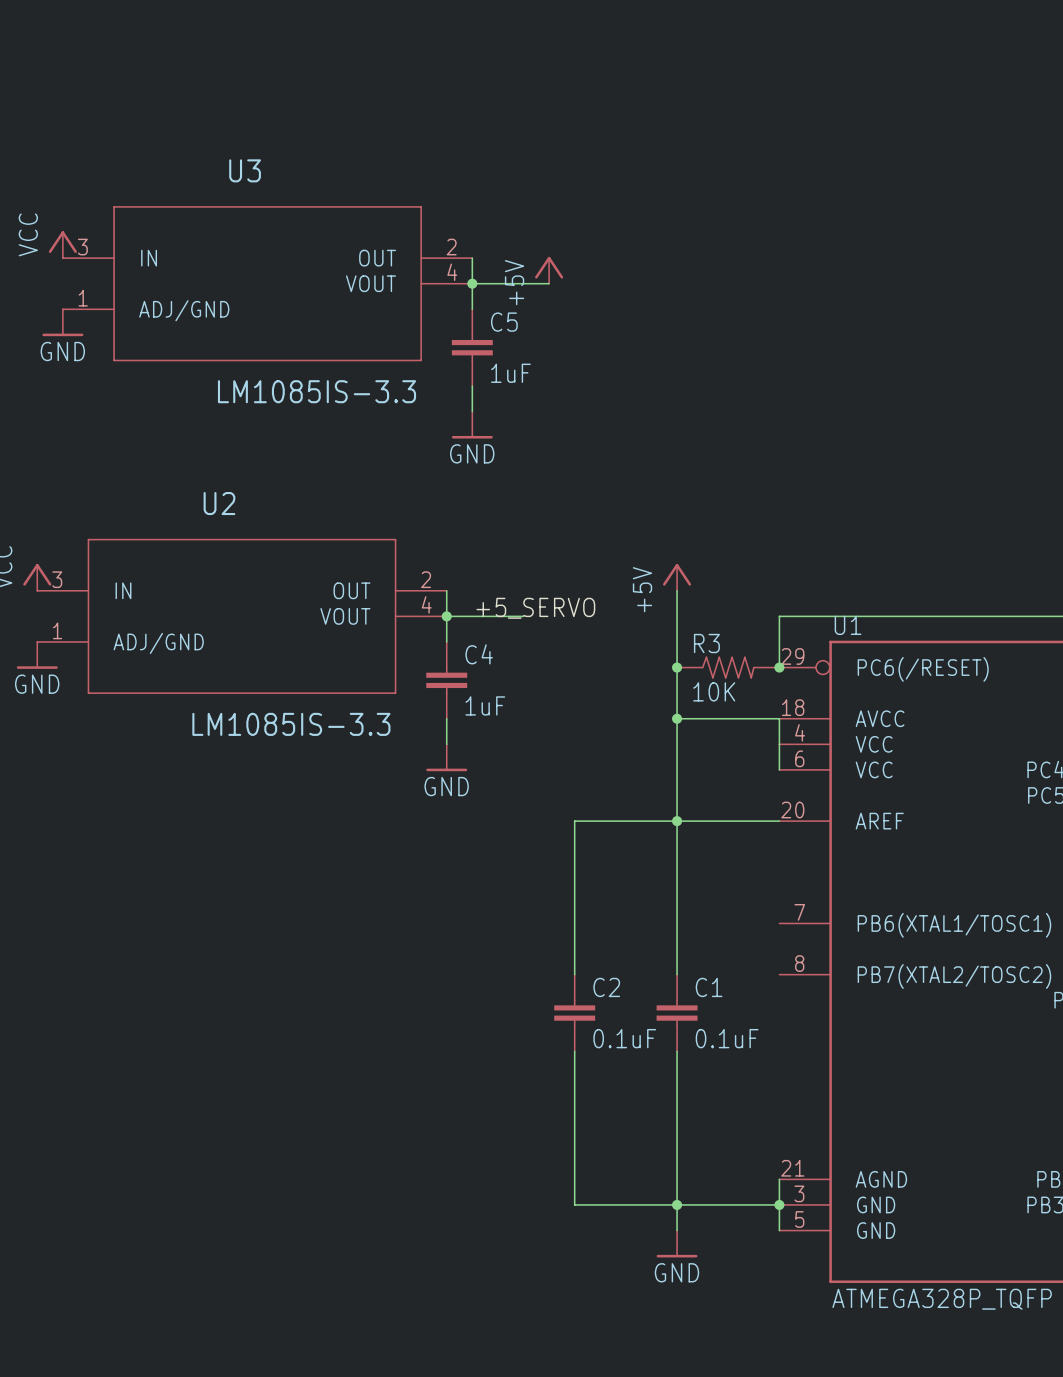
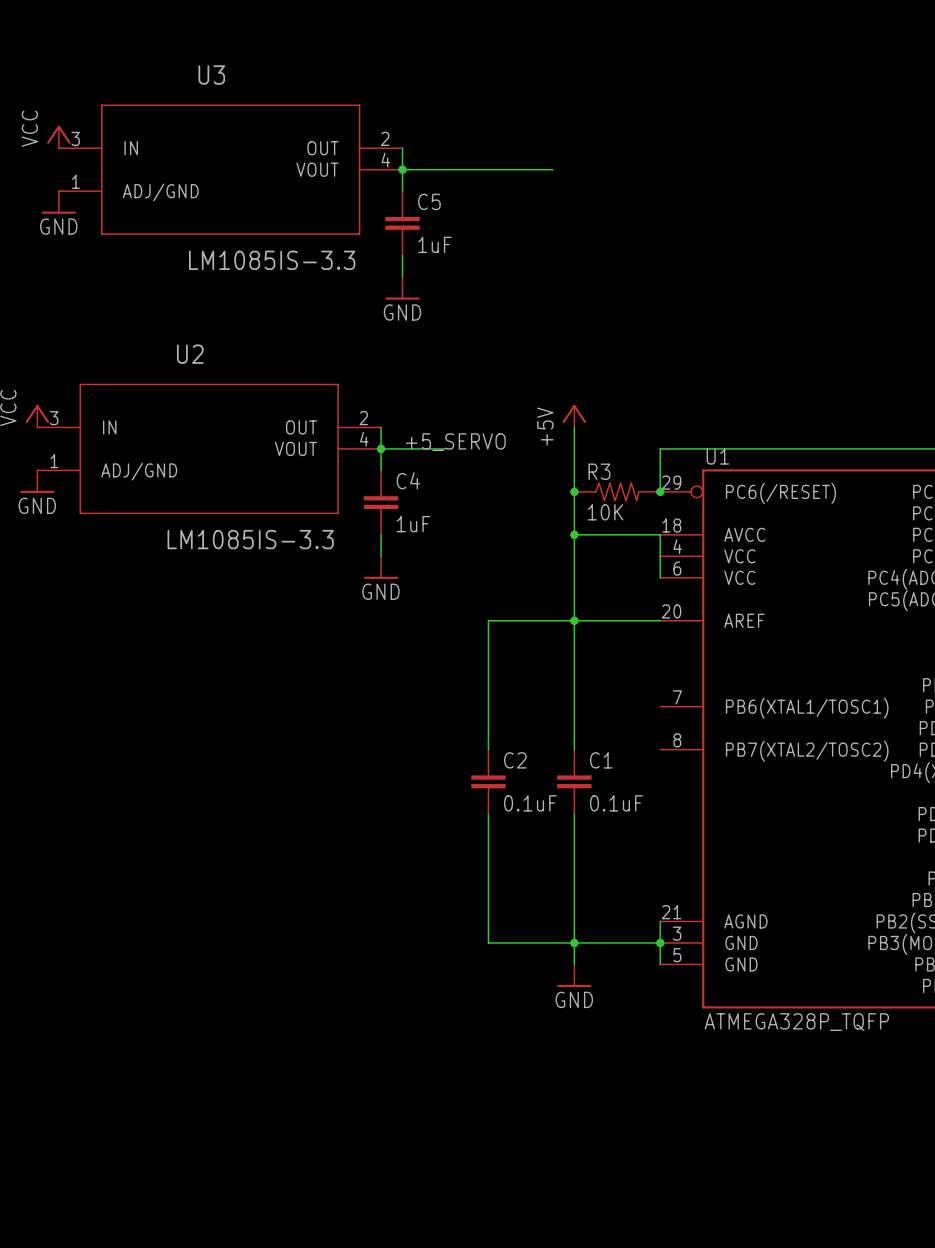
power symbol: +5V (549, 270) -> none
wire: none -> (466, 169) (552, 169)

